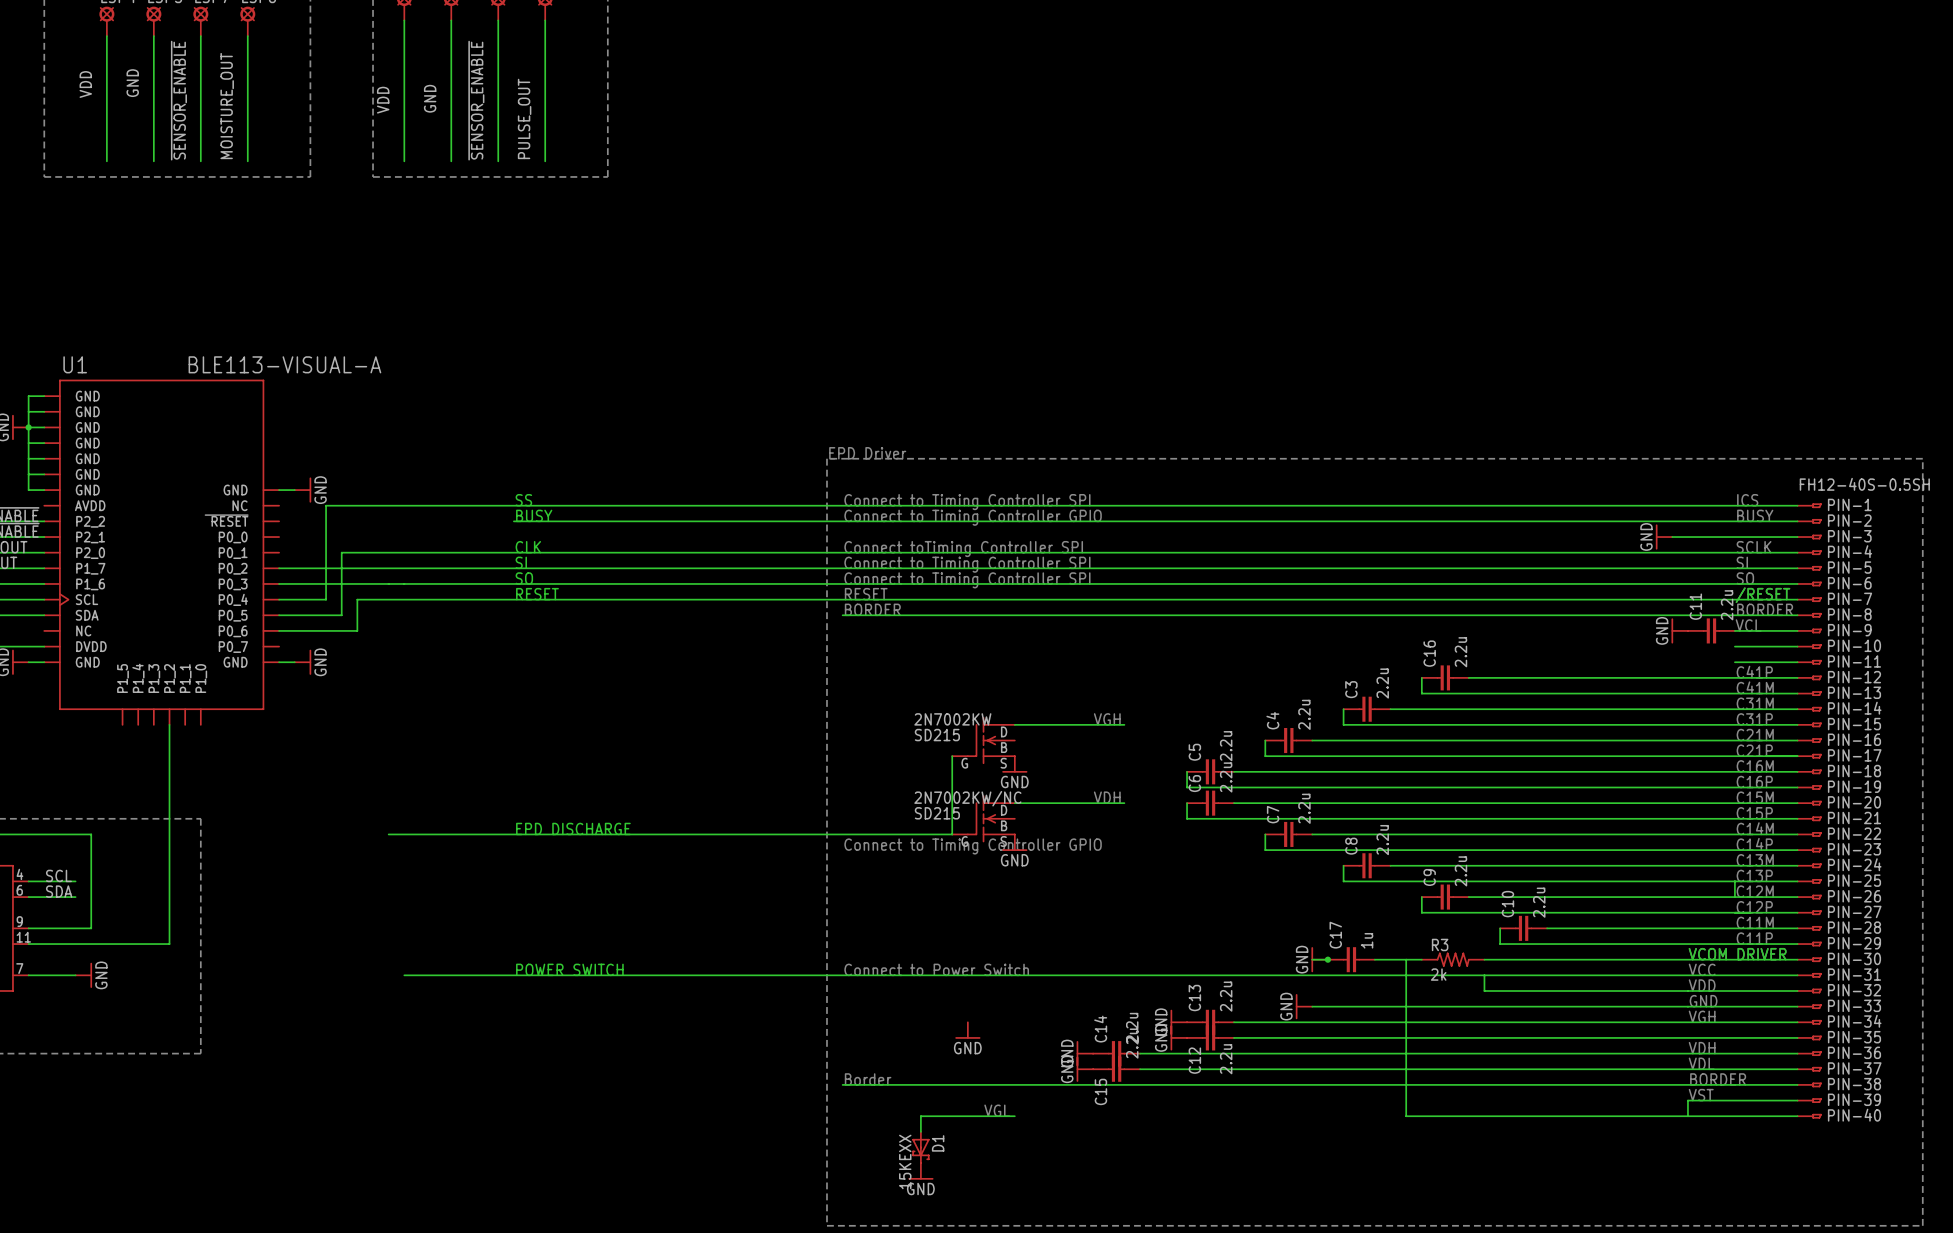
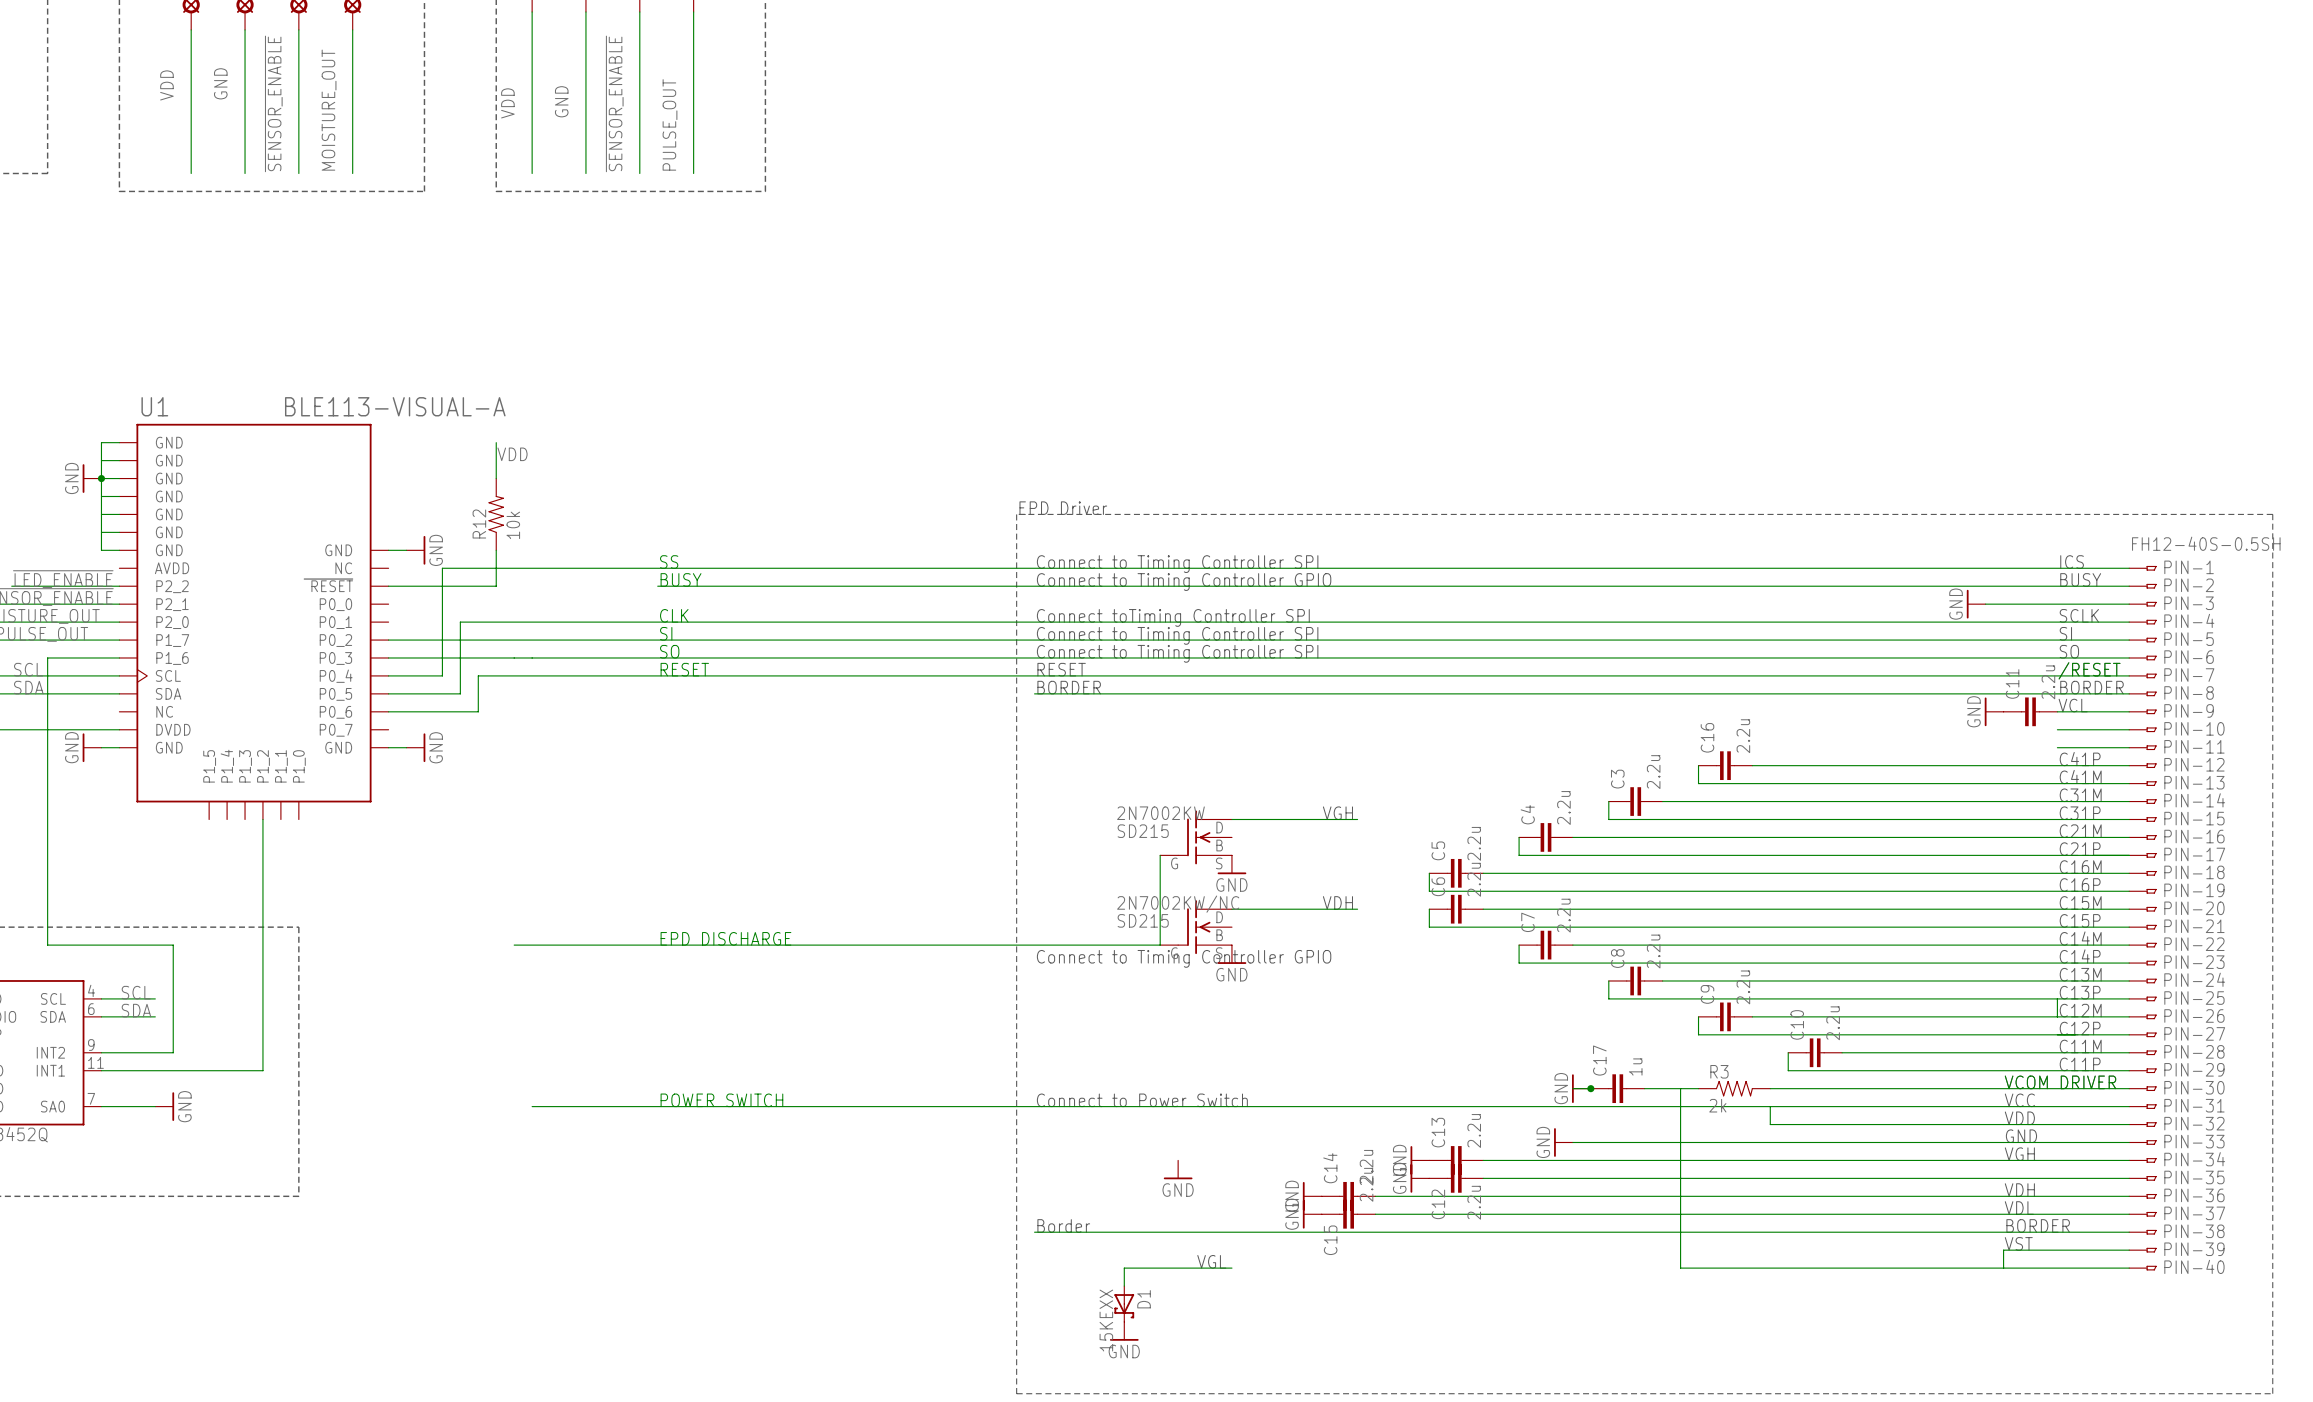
wire: none -> (496, 442) (496, 478)
label: none -> VDD (512, 454)
R12: none -> 10k (496, 514)
wire: none -> (496, 550) (496, 586) (388, 586)

